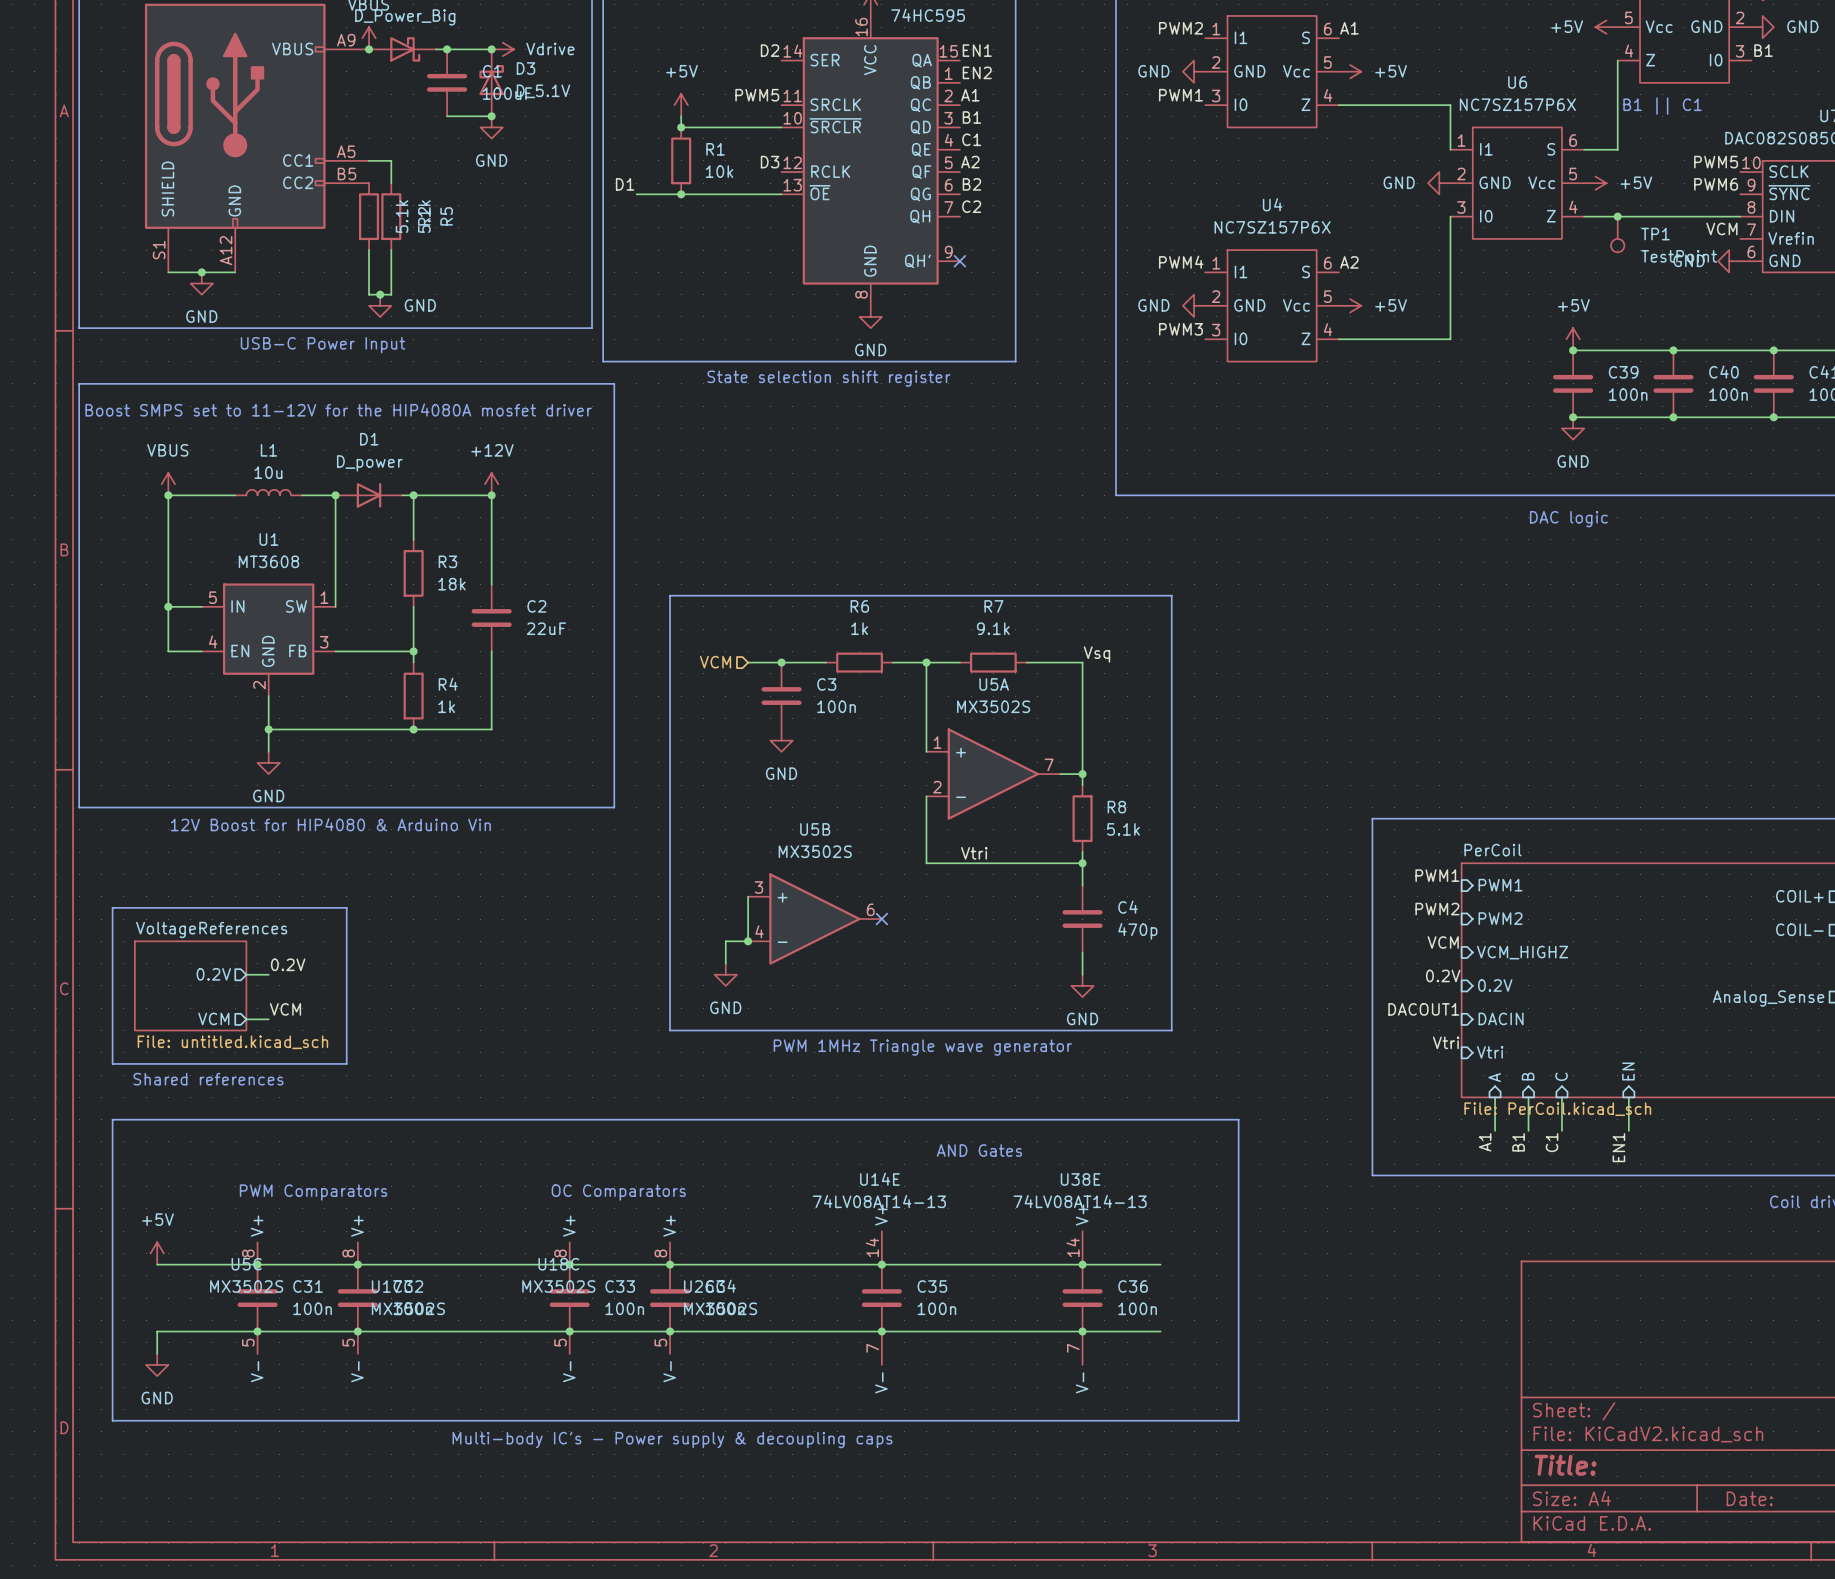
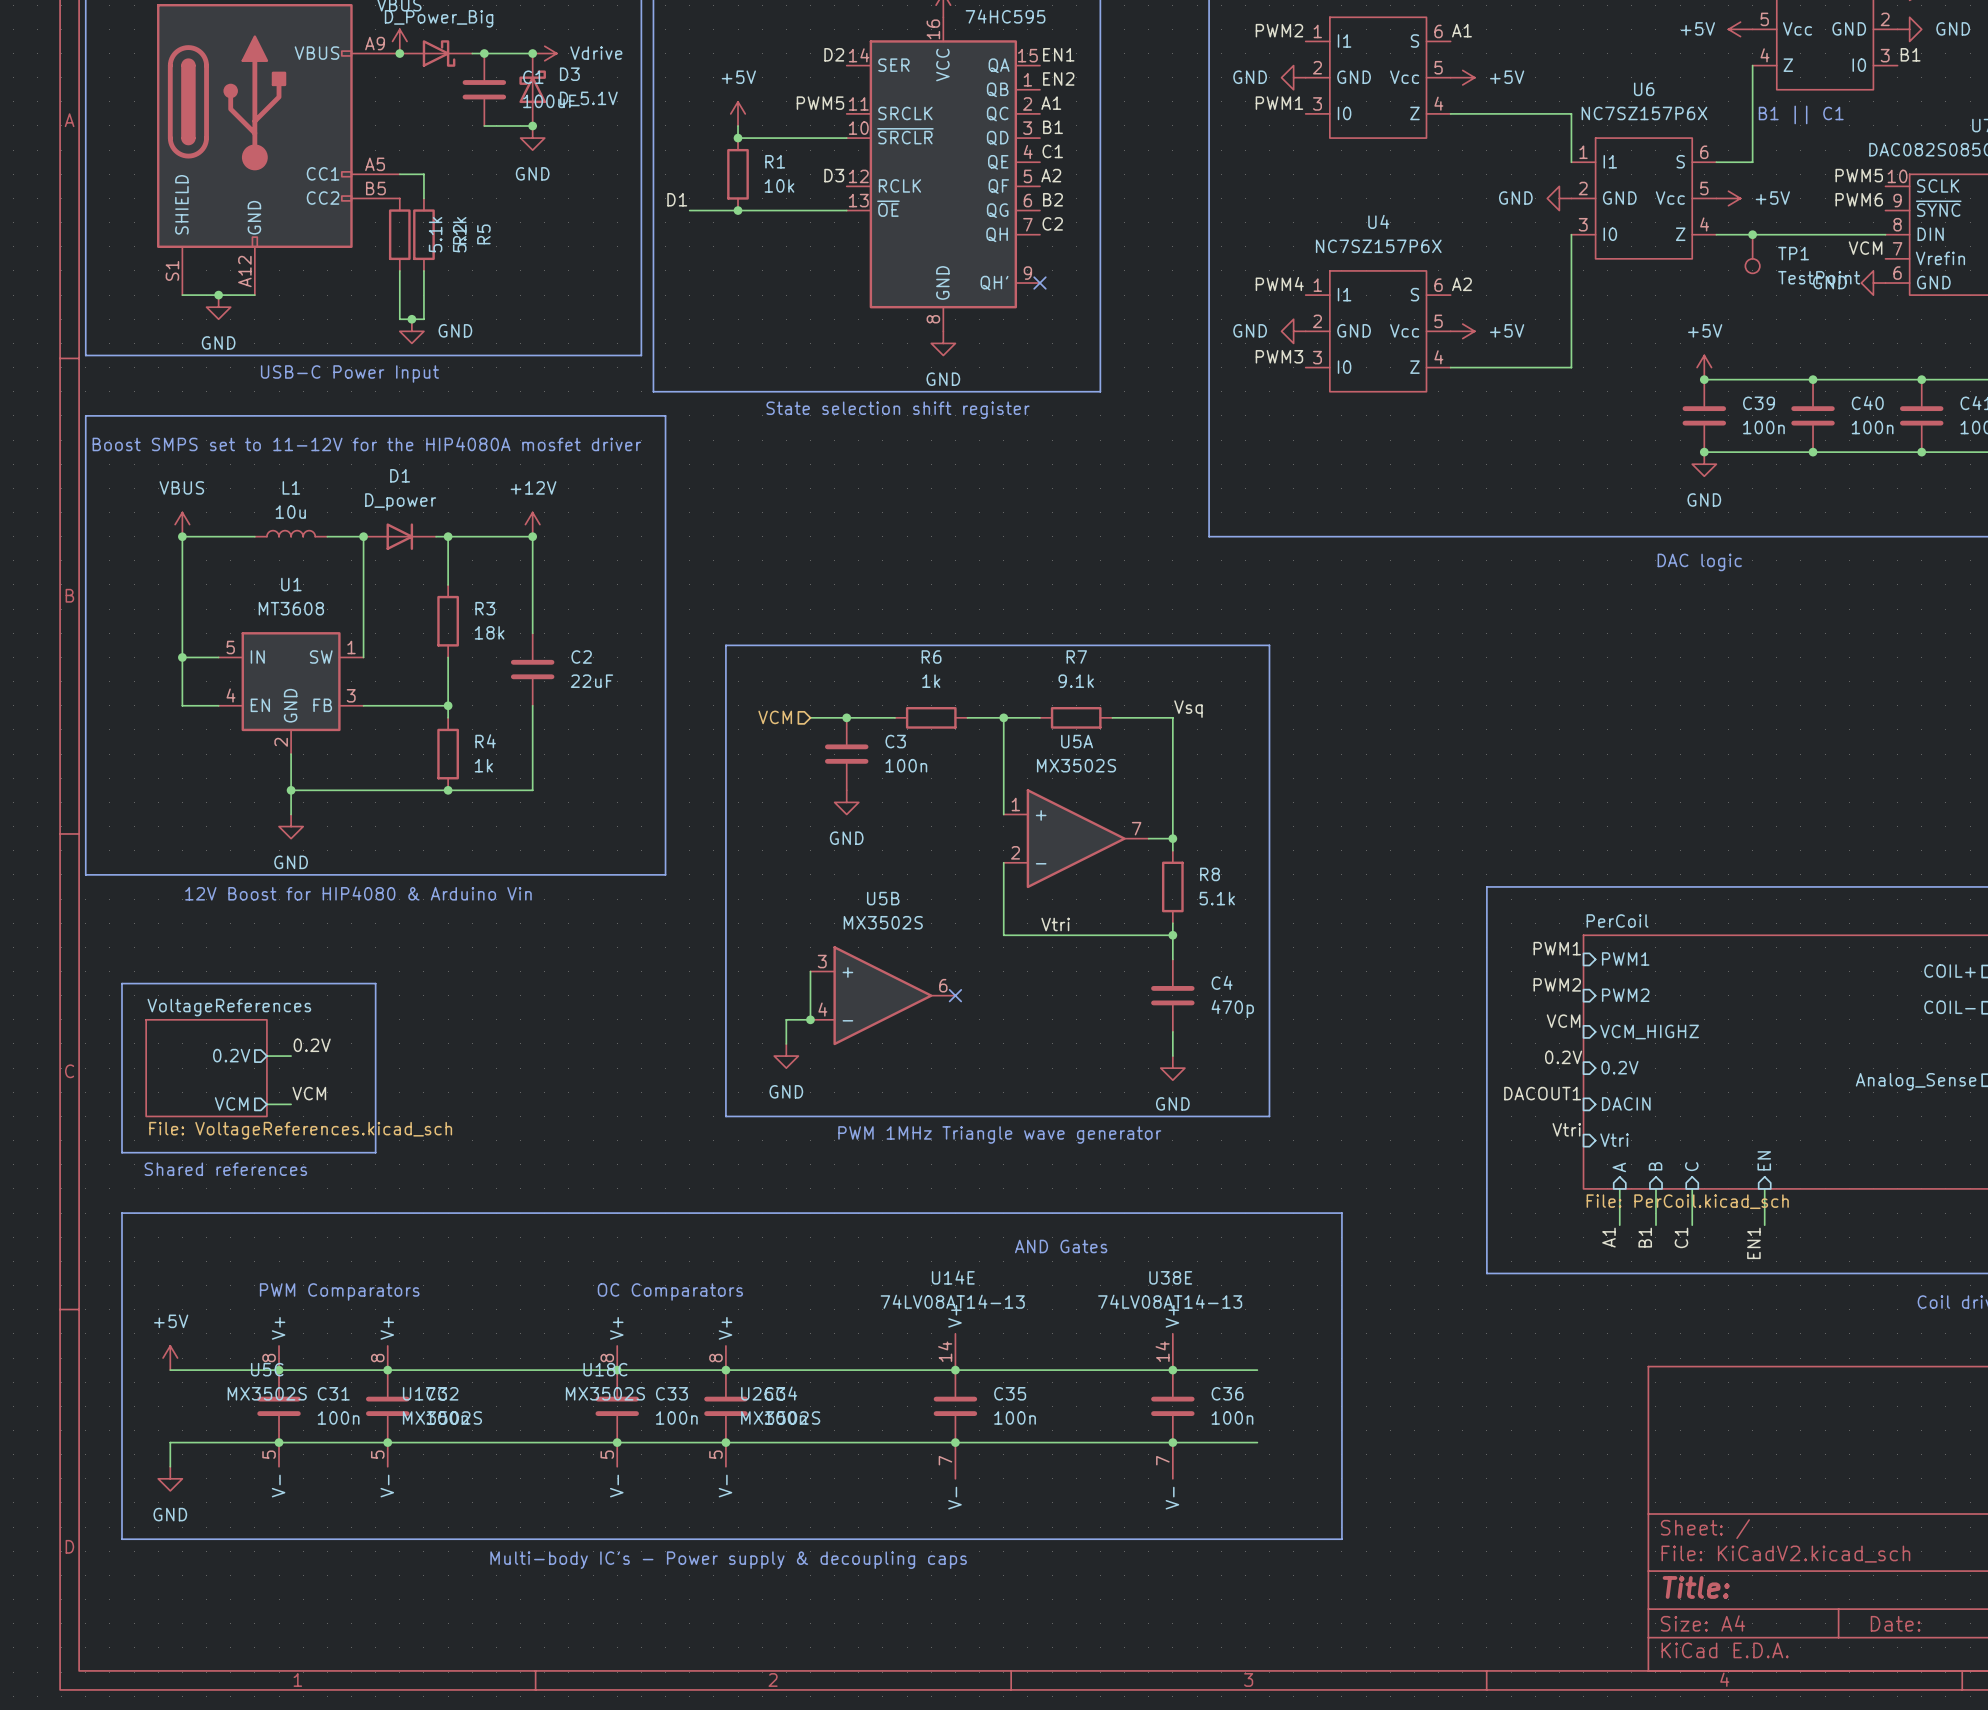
sheet VoltageReferences value: File: untitled.kicad_sch (232, 1042) -> File: VoltageReferences.kicad_sch (300, 1130)

